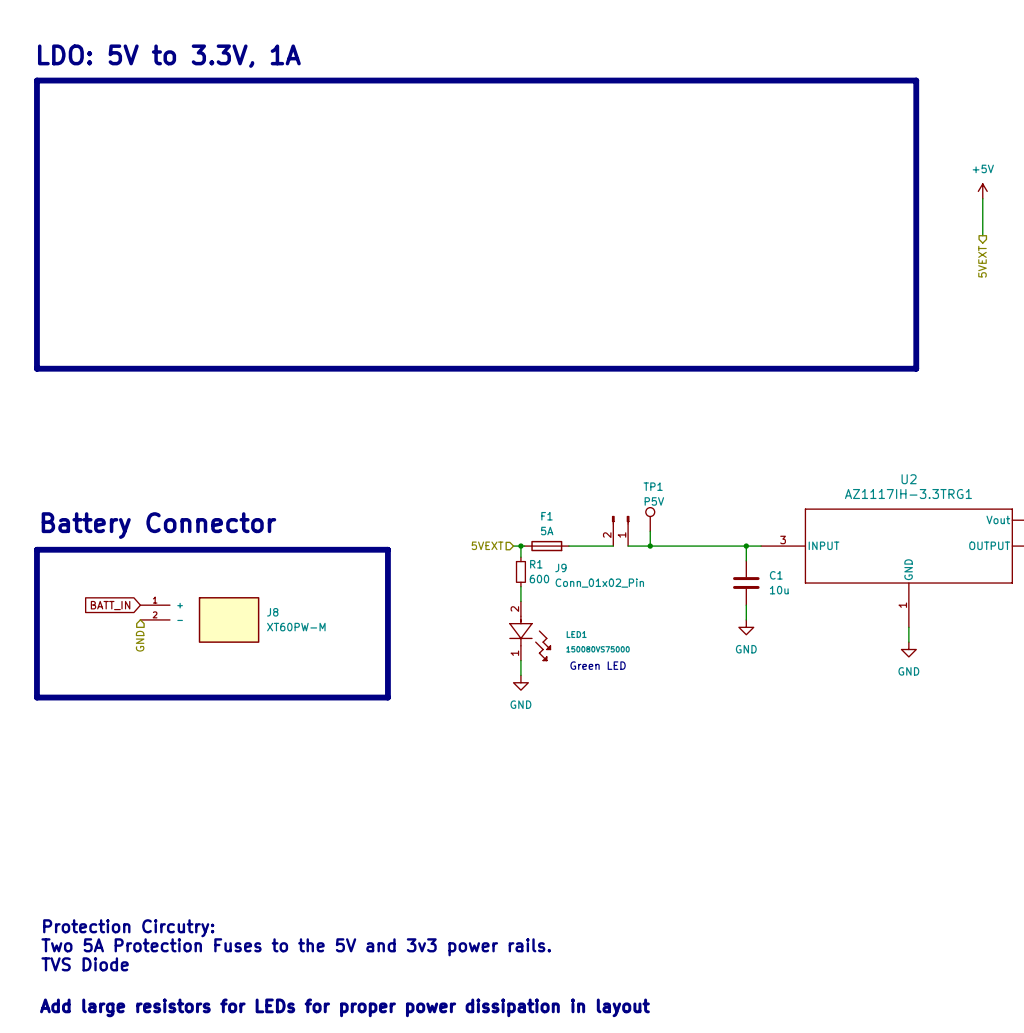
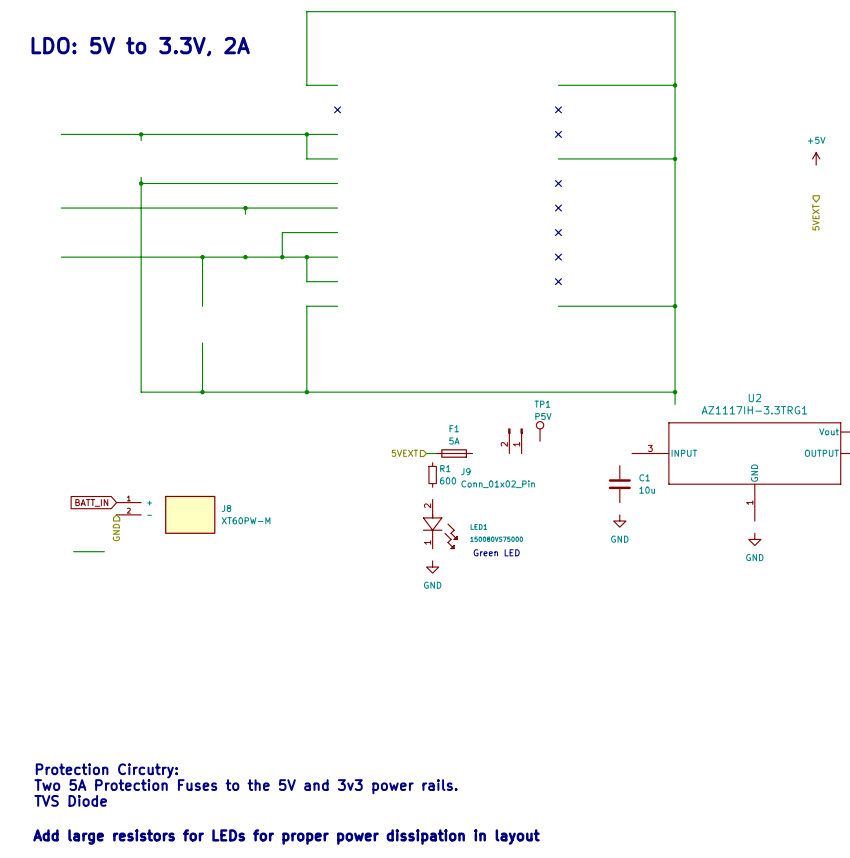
text: LDO: 5V to 3.3V, 1A (169, 56) -> LDO: 5V to 3.3V, 2A (140, 46)
line: (36, 80) (916, 80) (916, 368) (36, 368) (36, 80) -> none
wire: none -> (337, 85) (306, 85) (306, 11) (675, 11) (675, 404)
wire: none -> (558, 85) (675, 85)
junction: none -> (675, 85)
no-connect mark: none -> (337, 109)
no-connect mark: none -> (558, 109)
wire: none -> (61, 134) (337, 134)
wire: none -> (141, 134) (141, 140)
junction: none -> (141, 134)
wire: none -> (306, 134) (306, 158) (337, 158)
junction: none -> (306, 134)
no-connect mark: none -> (558, 134)
wire: none -> (558, 158) (675, 158)
junction: none -> (675, 158)
wire: (982, 198) (982, 235) -> none
wire: none -> (141, 177) (141, 392) (675, 392)
wire: none -> (141, 183) (337, 183)
junction: none -> (141, 183)
no-connect mark: none -> (558, 183)
wire: none -> (61, 208) (337, 208)
wire: none -> (245, 208) (245, 214)
junction: none -> (245, 208)
no-connect mark: none -> (558, 208)
wire: none -> (337, 232) (282, 232) (282, 257)
no-connect mark: none -> (558, 232)
wire: none -> (61, 257) (337, 257)
wire: none -> (202, 257) (202, 306)
junction: none -> (202, 257)
junction: none -> (245, 257)
junction: none -> (282, 257)
wire: none -> (306, 257) (306, 281) (337, 281)
junction: none -> (306, 257)
no-connect mark: none -> (558, 257)
no-connect mark: none -> (558, 281)
wire: none -> (337, 306) (306, 306) (306, 392)
junction: none -> (675, 306)
wire: none -> (202, 343) (202, 392)
junction: none -> (202, 392)
junction: none -> (306, 392)
junction: none -> (675, 392)
text: Battery Connector (158, 525) -> none
wire: (650, 531) (650, 546) -> none
wire: (520, 546) (520, 557) -> none
junction: (520, 546) -> none
wire: (568, 546) (613, 546) -> none
wire: (628, 546) (761, 546) -> none
junction: (650, 546) -> none
wire: (746, 546) (746, 560) -> none
junction: (746, 546) -> none
line: (36, 549) (36, 697) (387, 697) (387, 549) (36, 549) -> none
wire: (520, 586) (520, 601) -> none
wire: (746, 605) (746, 619) -> none
wire: (908, 627) (908, 642) -> none
wire: (520, 660) (520, 675) -> none
wire: none -> (73, 551) (104, 551)

